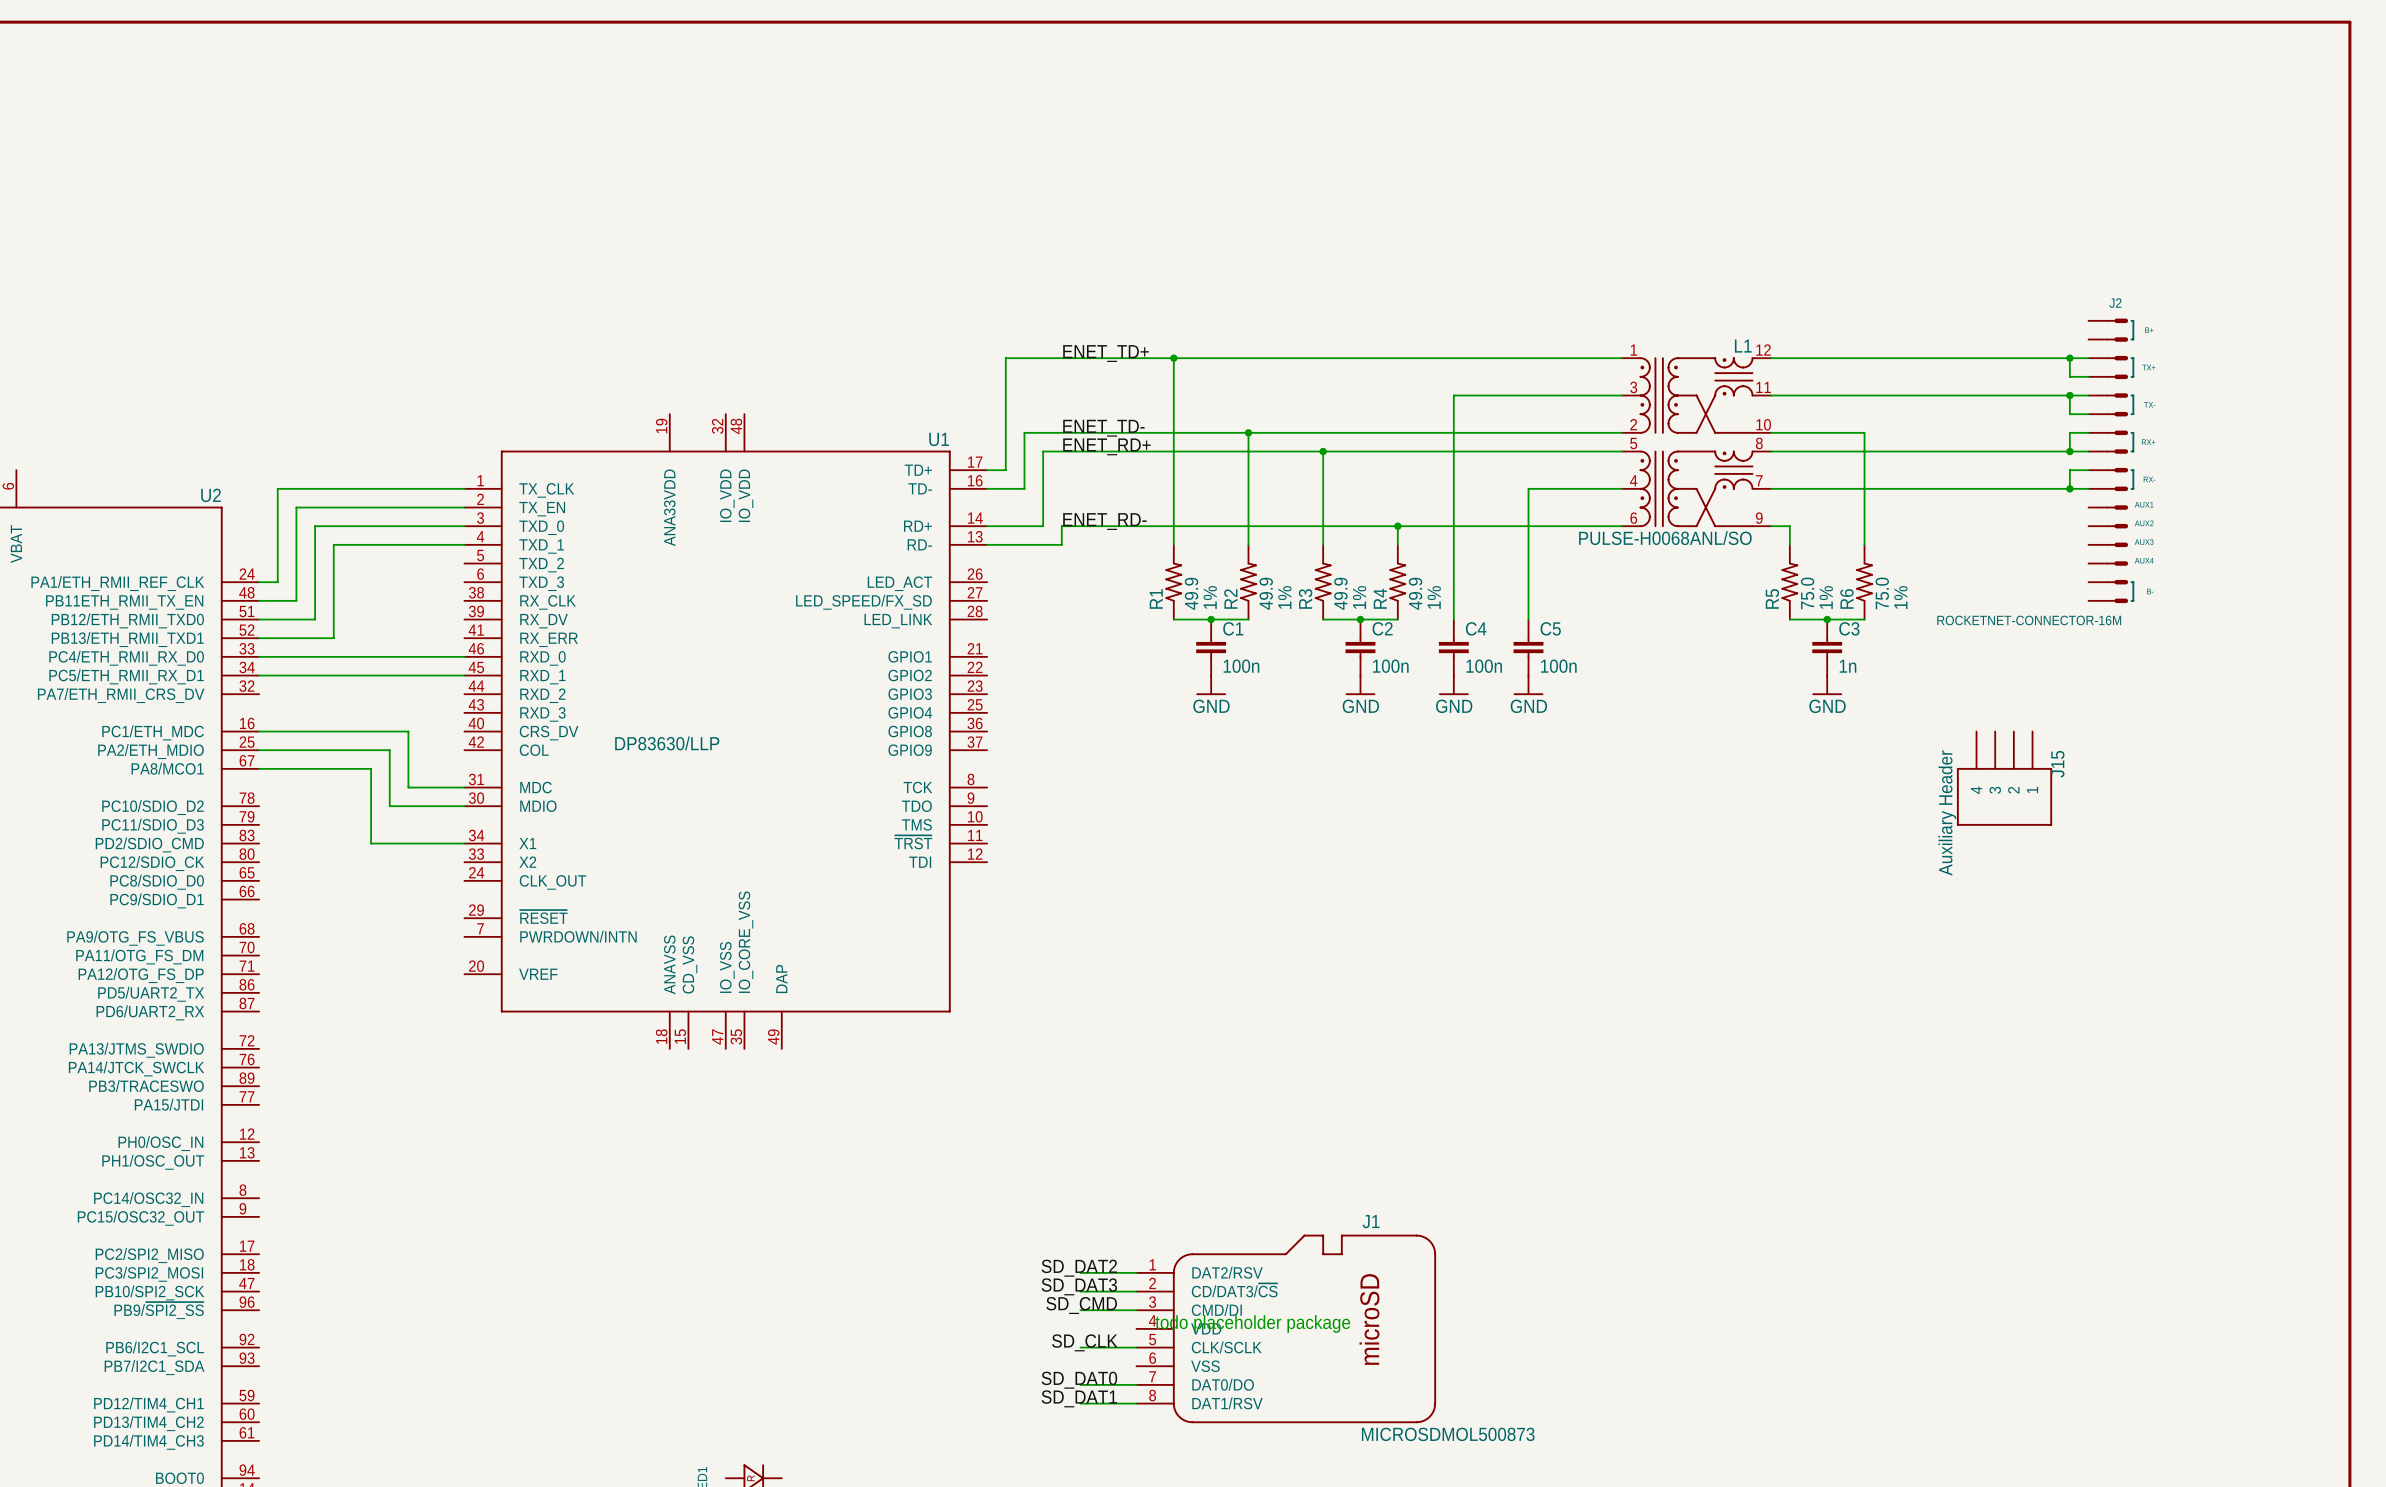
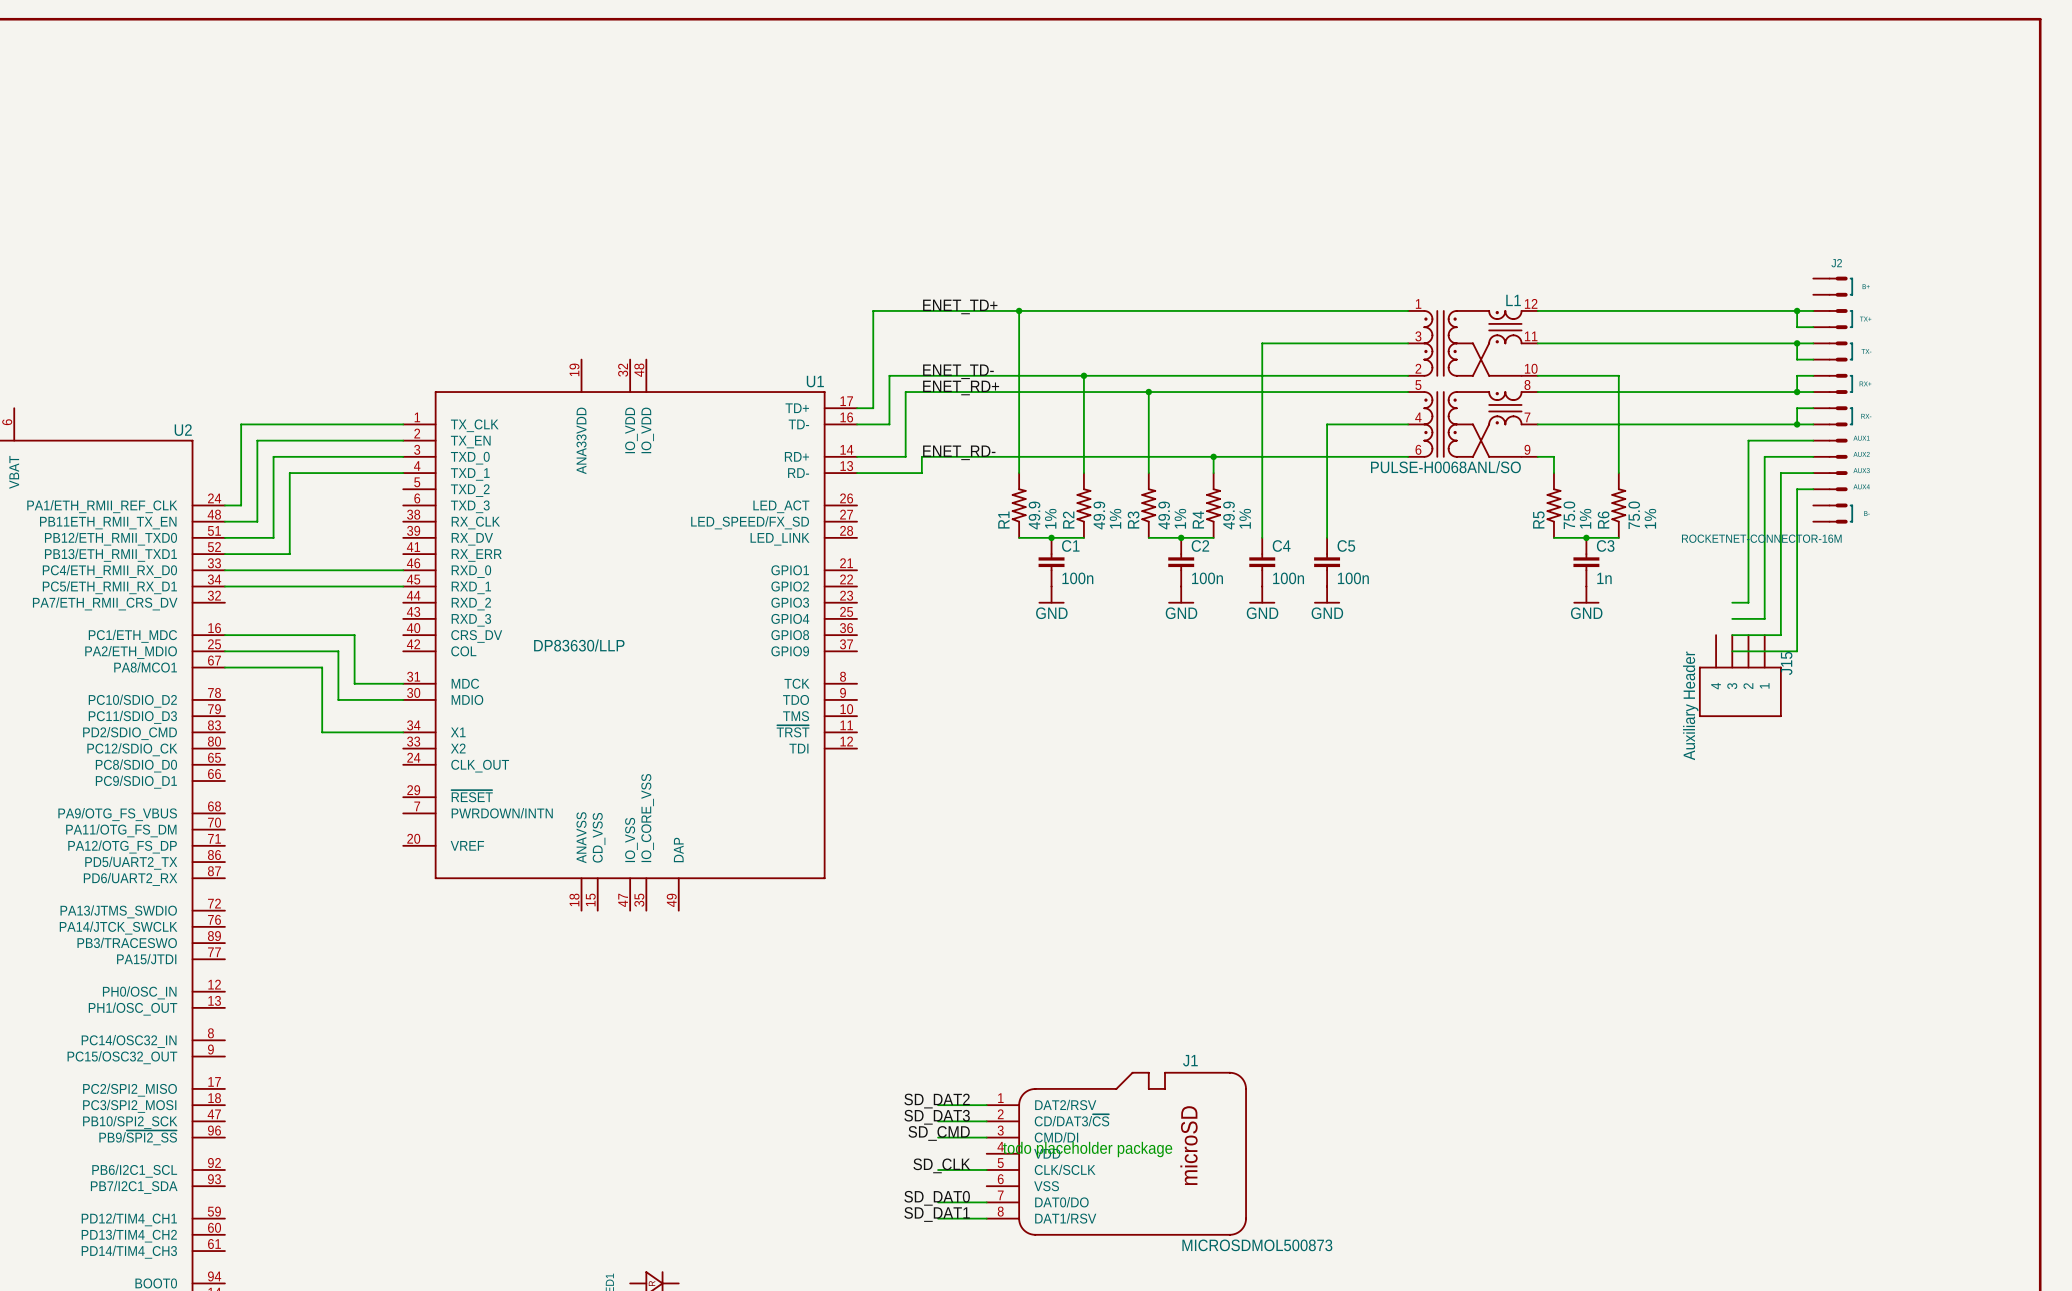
wire: none -> (1813, 440) (1748, 440) (1748, 602) (1732, 602)
wire: none -> (1813, 456) (1764, 456) (1764, 618) (1732, 618)
wire: none -> (1813, 473) (1780, 473) (1780, 635) (1732, 635)
wire: none -> (1813, 489) (1797, 489) (1797, 651) (1732, 651)

